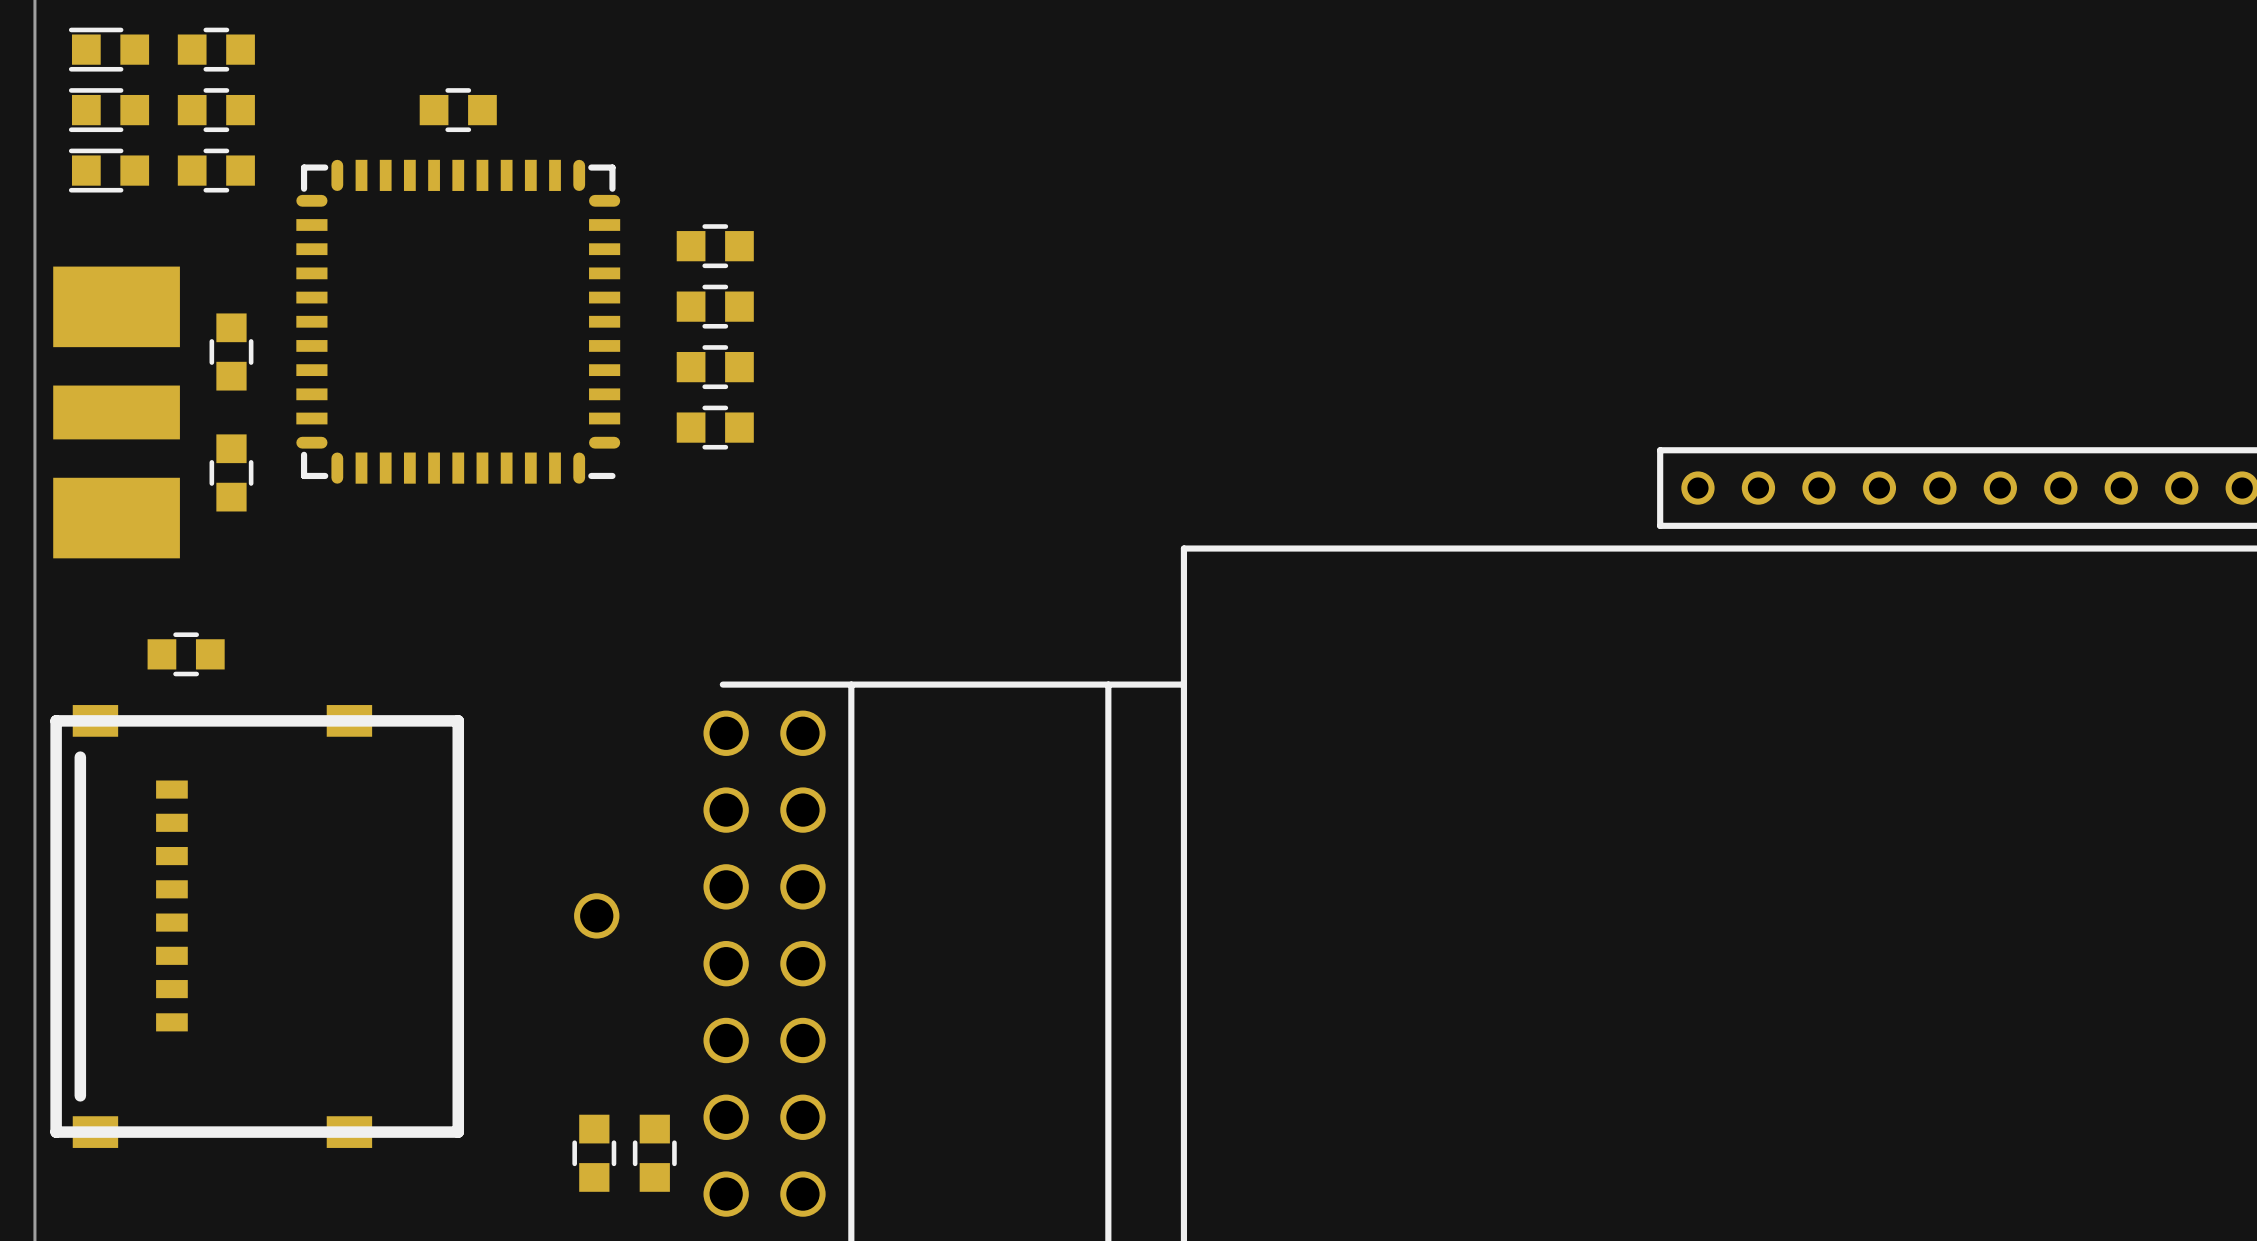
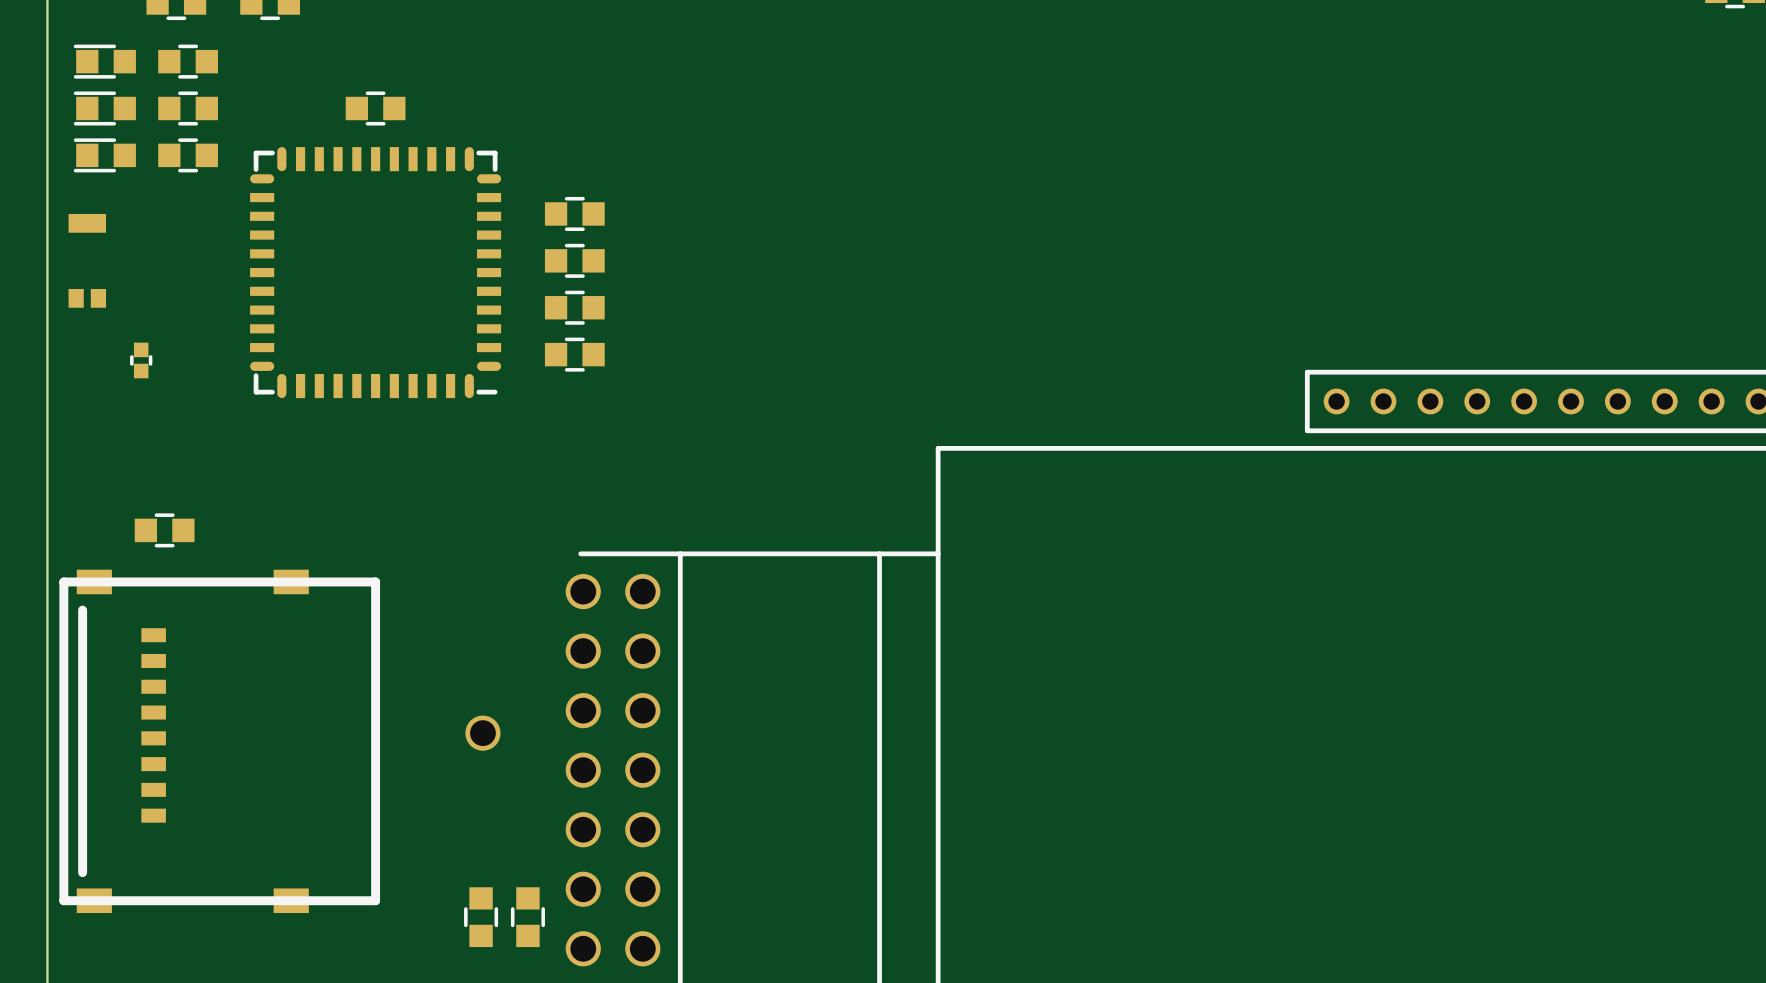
part: none -> (87, 260)
part: (231, 351) -> none
part: (116, 412) -> none
part: none -> (141, 360)
part: (231, 472) -> none

